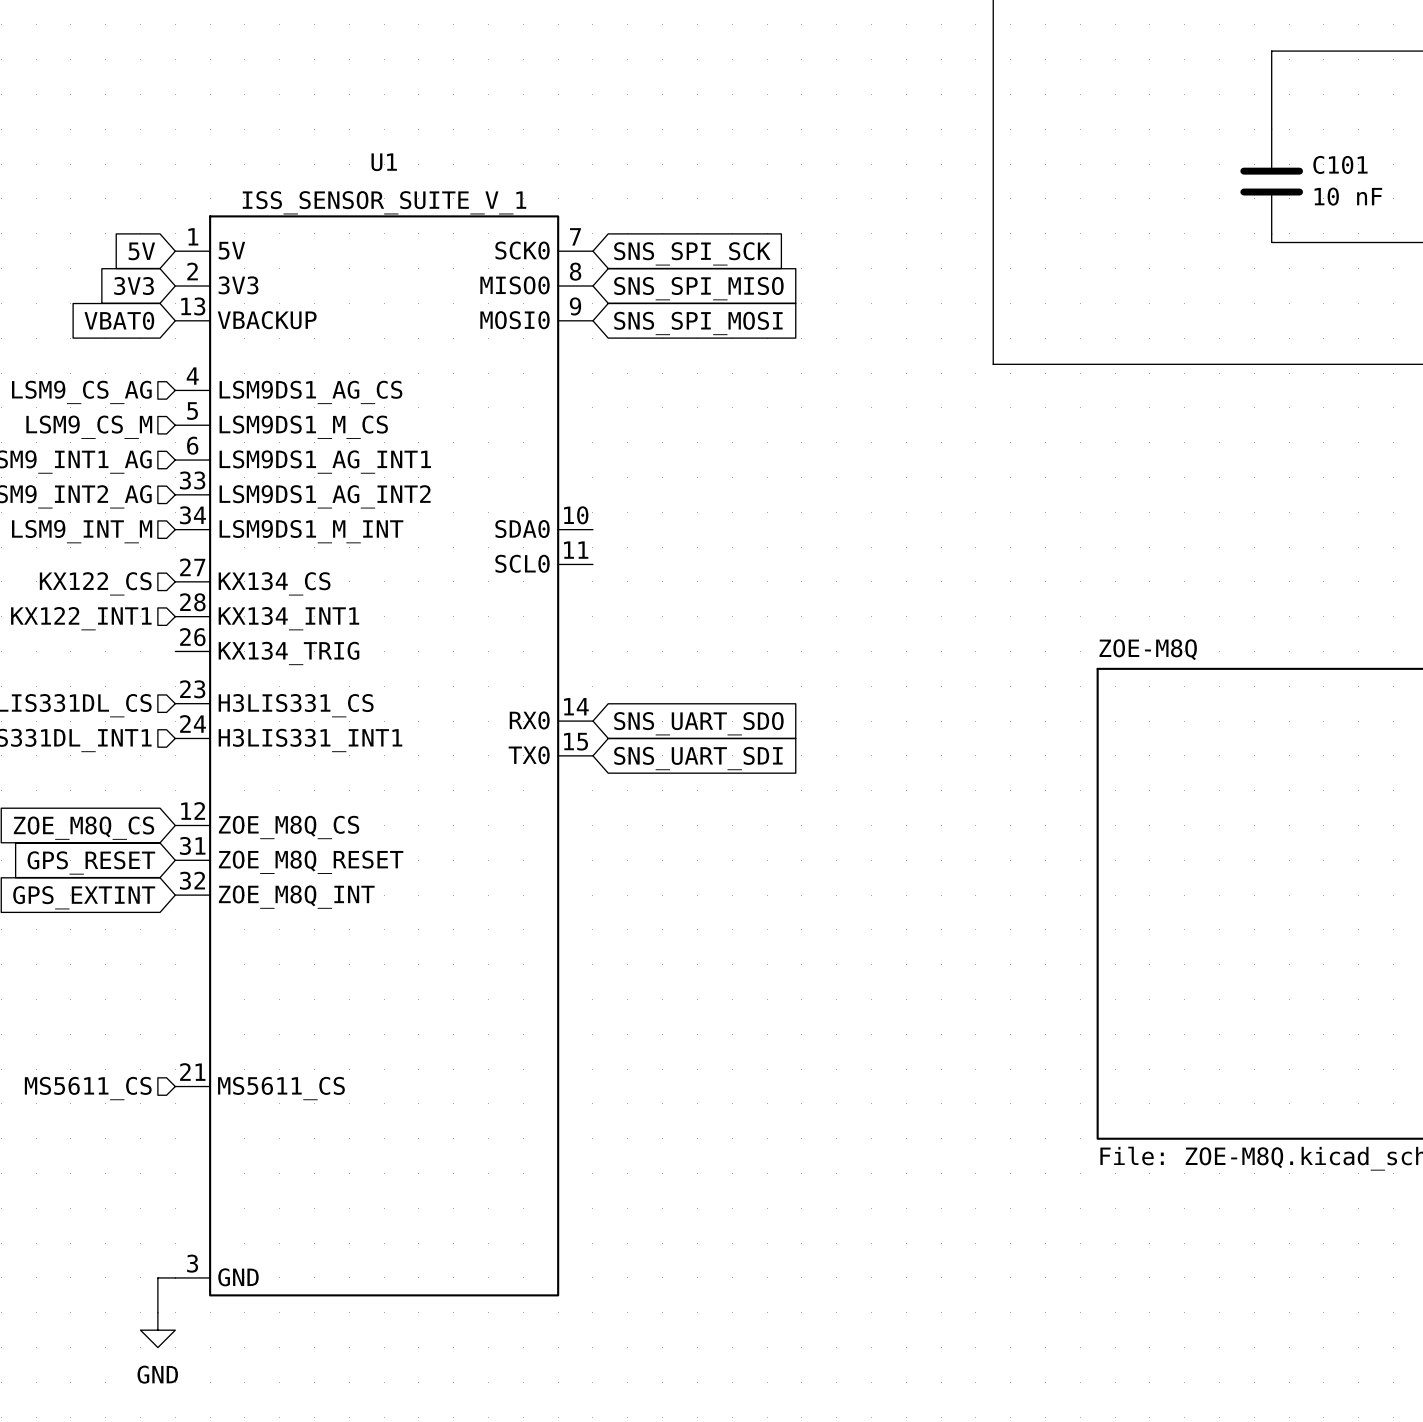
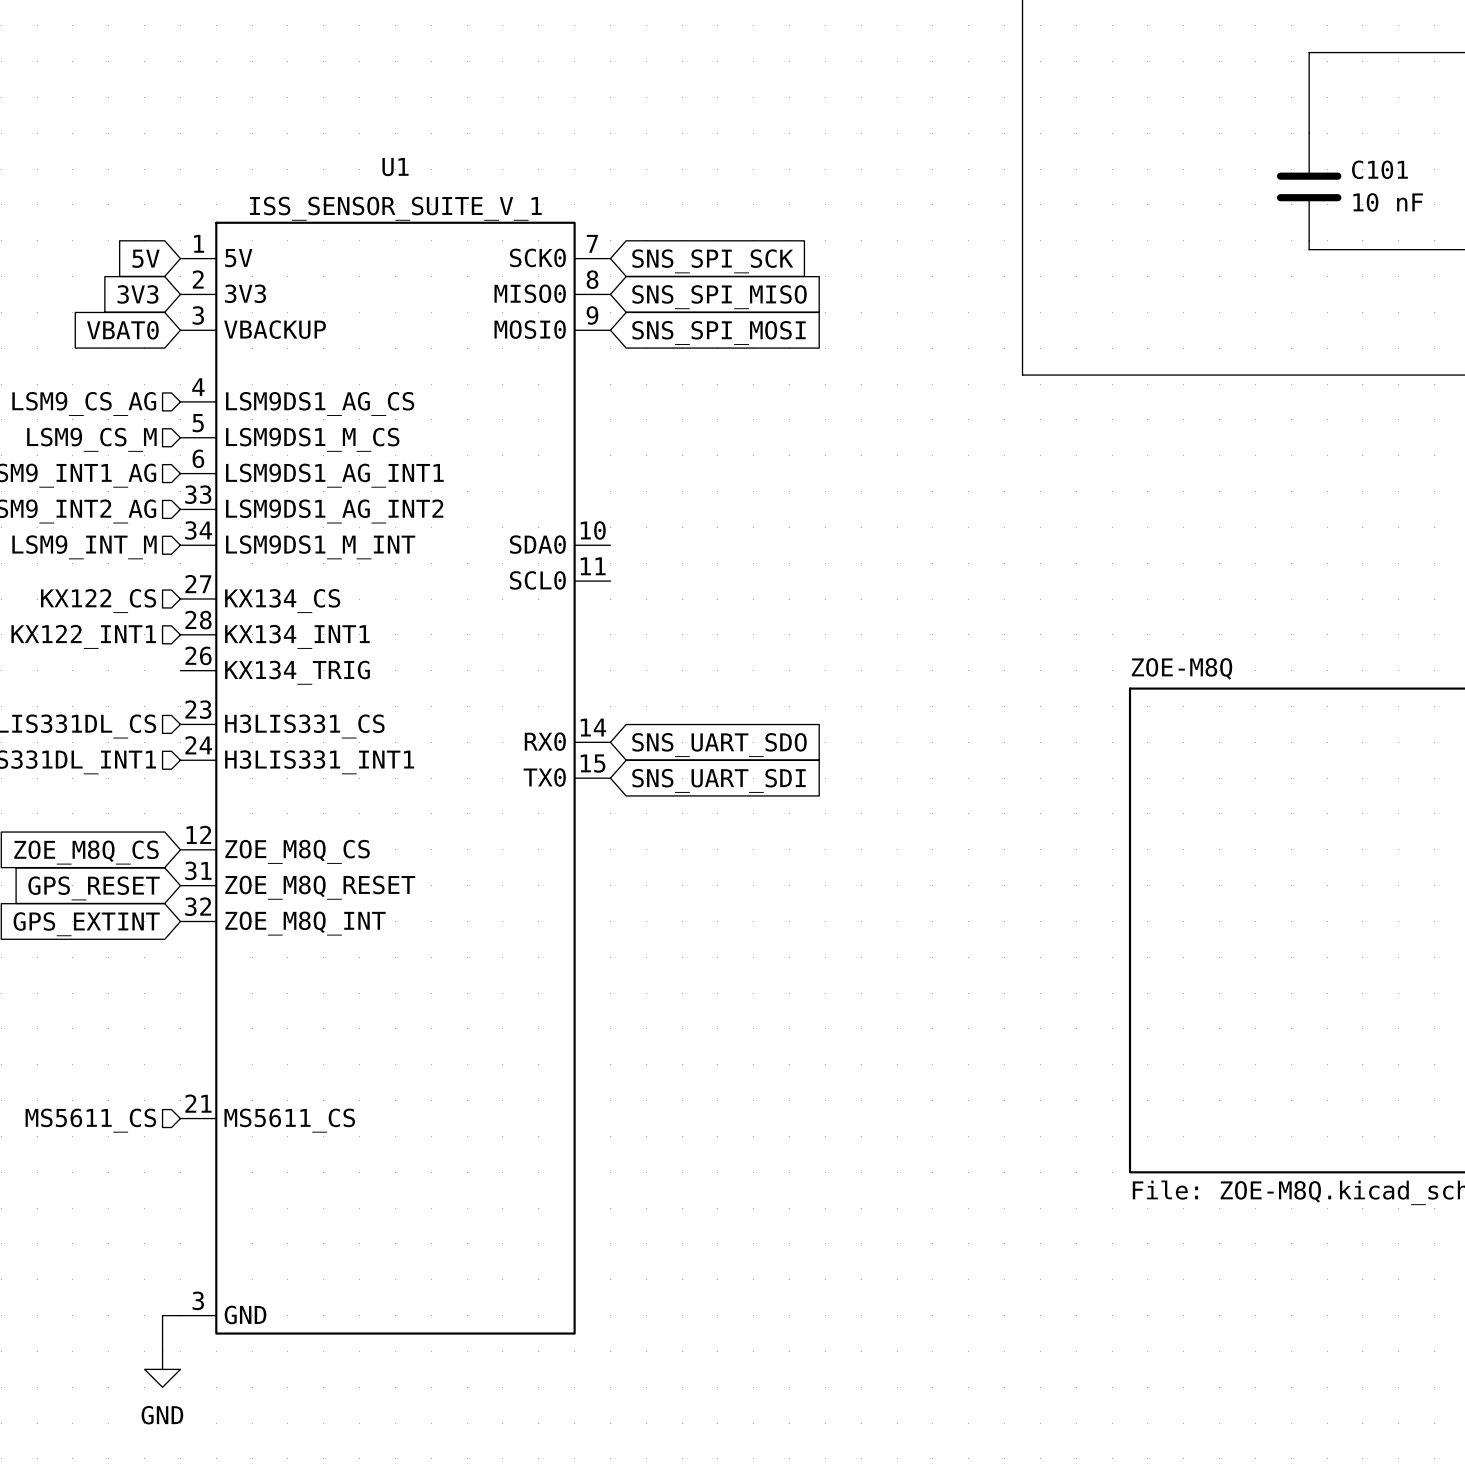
U1 pin number: 13 (193, 306) -> 3 (198, 315)

